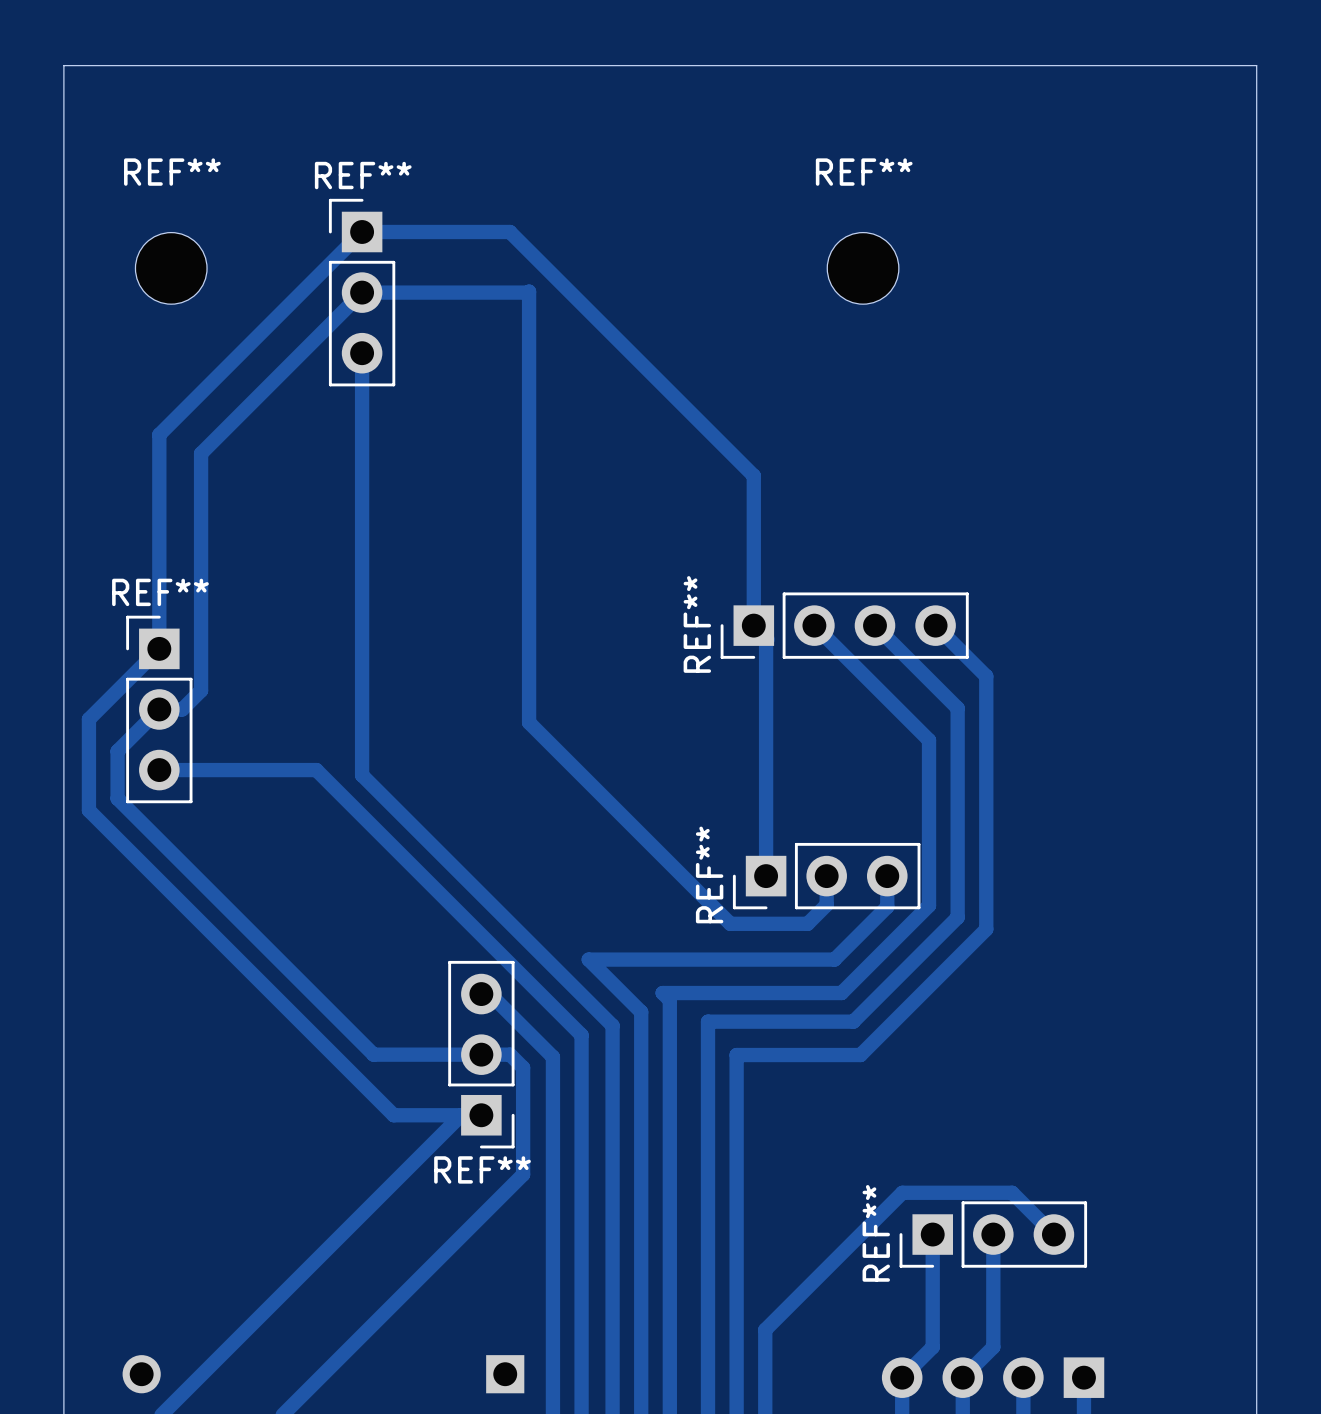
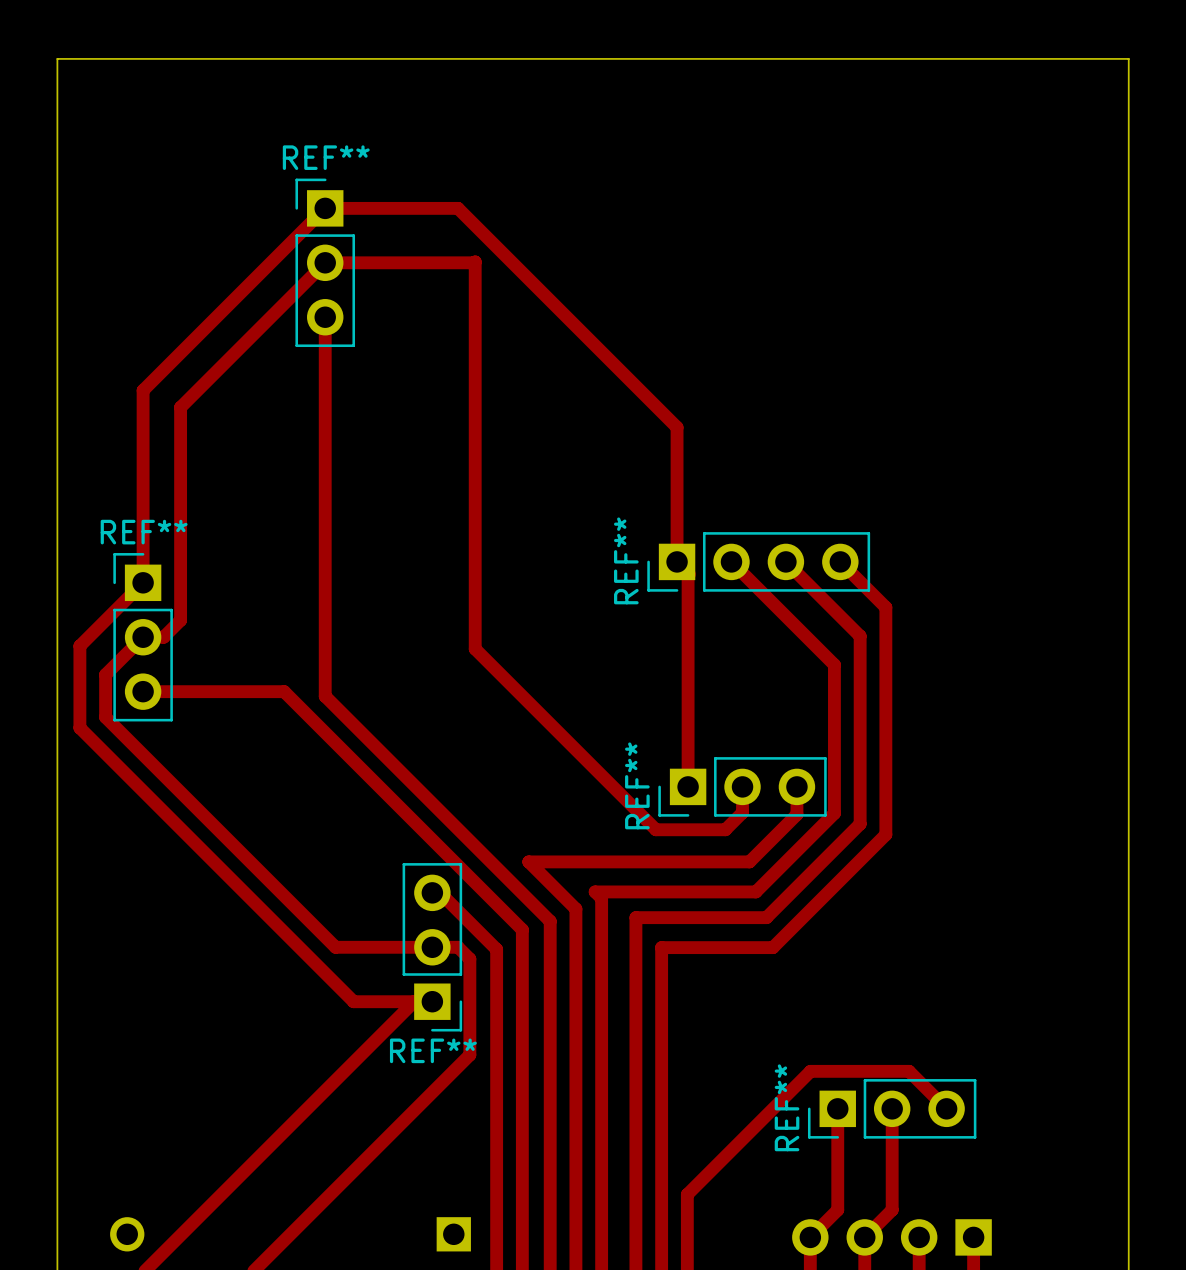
REF**: (171, 268) -> none
REF**: (863, 268) -> none

